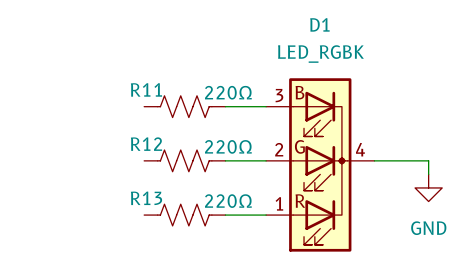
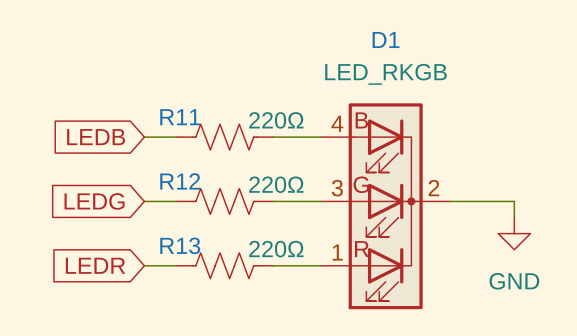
D1 value: LED_RGBK (320, 54) -> LED_RKGB (386, 74)
D1 pin number: 3 (279, 95) -> 4 (337, 123)
global label: none -> LEDB (96, 137)
wire: none -> (144, 137) (176, 137)
D1 pin number: 2 (279, 149) -> 3 (337, 188)
D1 pin number: 4 (360, 149) -> 2 (433, 188)
global label: none -> LEDG (94, 201)
wire: none -> (144, 201) (176, 201)
global label: none -> LEDR (95, 265)
wire: none -> (144, 265) (176, 265)

